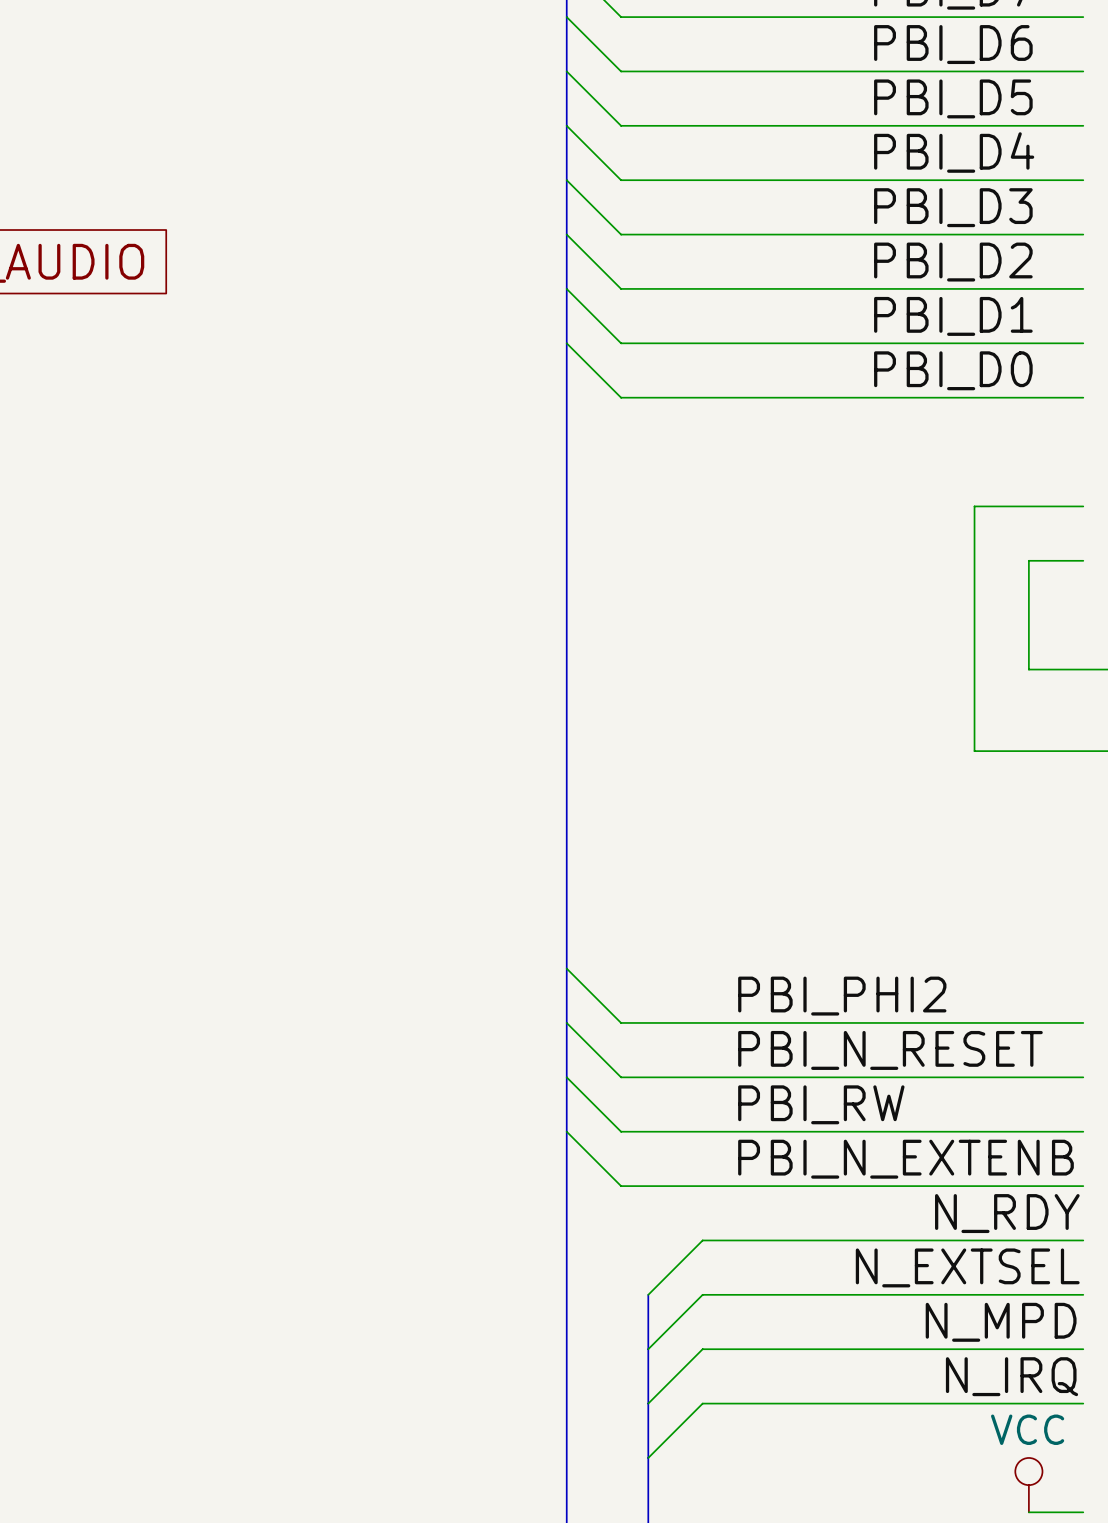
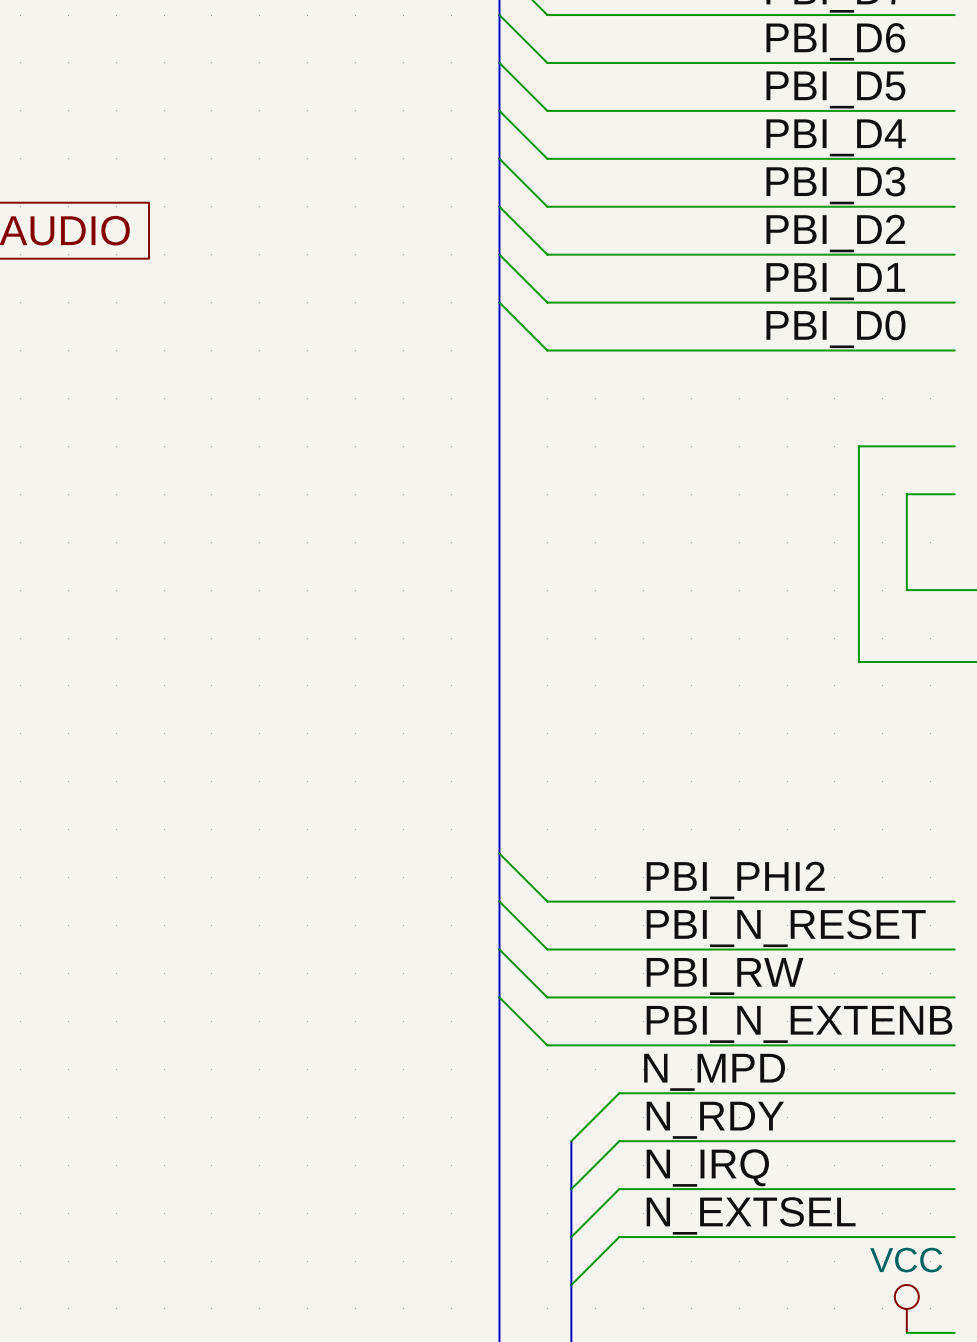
label position: N_RDY (1007, 1213) -> N_RDY (715, 1120)
label position: N_EXTSEL (967, 1267) -> N_EXTSEL (751, 1215)
label position: N_MPD (1001, 1322) -> N_MPD (714, 1072)
label position: N_IRQ (1011, 1376) -> N_IRQ (707, 1167)

